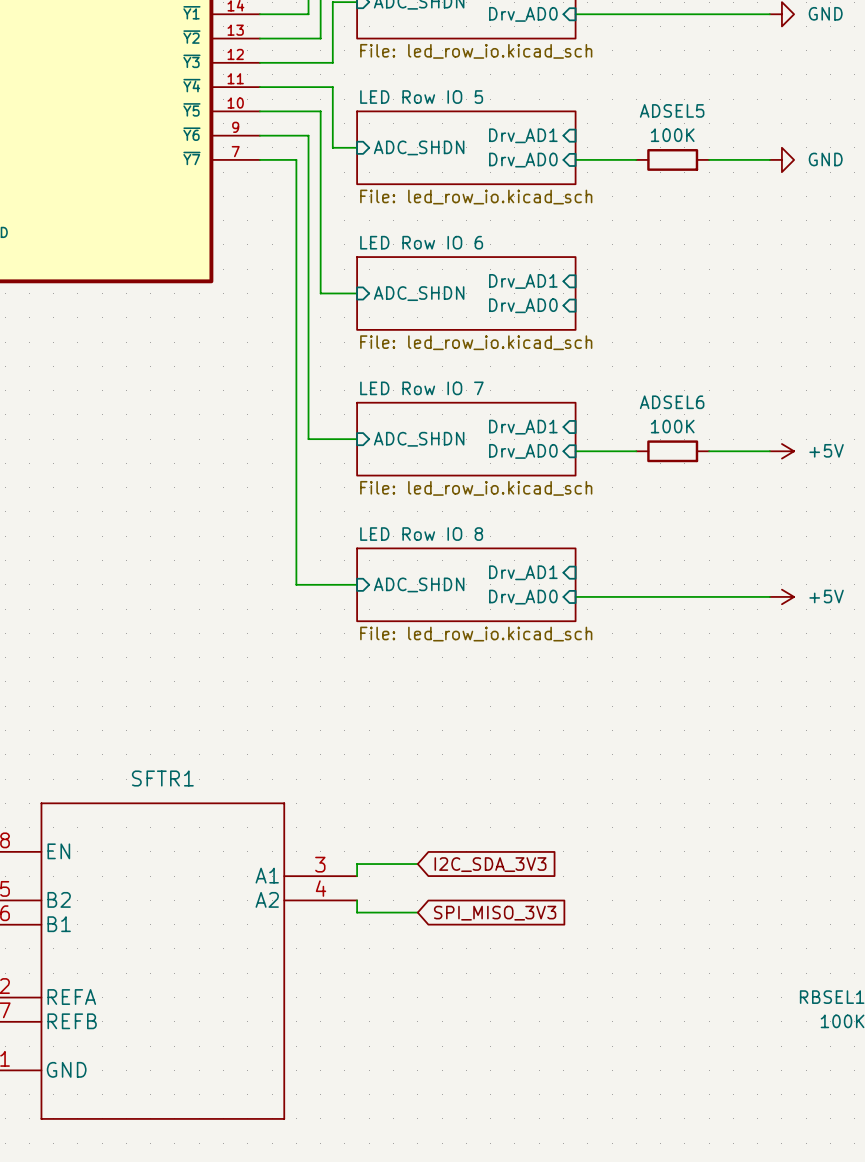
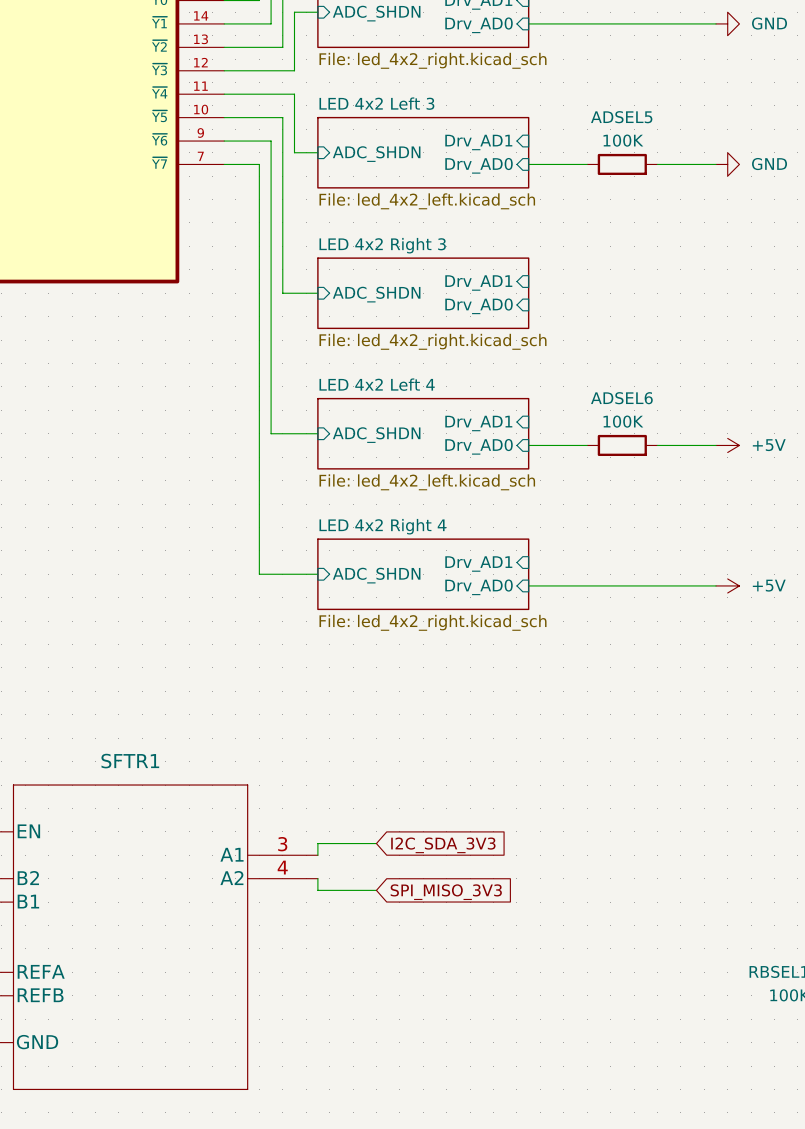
sheet value: File: led_row_io.kicad_sch (476, 51) -> File: led_4x2_right.kicad_sch (433, 60)
sheet LED Row IO 5 name: LED Row IO 5 (421, 97) -> LED 4x2 Left 3 (376, 103)
sheet LED Row IO 5 value: File: led_row_io.kicad_sch (476, 197) -> File: led_4x2_left.kicad_sch (427, 201)
sheet LED Row IO 6 name: LED Row IO 6 (421, 242) -> LED 4x2 Right 3 (382, 245)
sheet LED Row IO 6 value: File: led_row_io.kicad_sch (476, 342) -> File: led_4x2_right.kicad_sch (433, 341)
sheet LED Row IO 7 name: LED Row IO 7 (421, 388) -> LED 4x2 Left 4 (377, 384)
sheet LED Row IO 7 value: File: led_row_io.kicad_sch (476, 488) -> File: led_4x2_left.kicad_sch (427, 482)
sheet LED Row IO 8 name: LED Row IO 8 (421, 534) -> LED 4x2 Right 4 (382, 526)
sheet LED Row IO 8 value: File: led_row_io.kicad_sch (476, 634) -> File: led_4x2_right.kicad_sch (433, 622)

